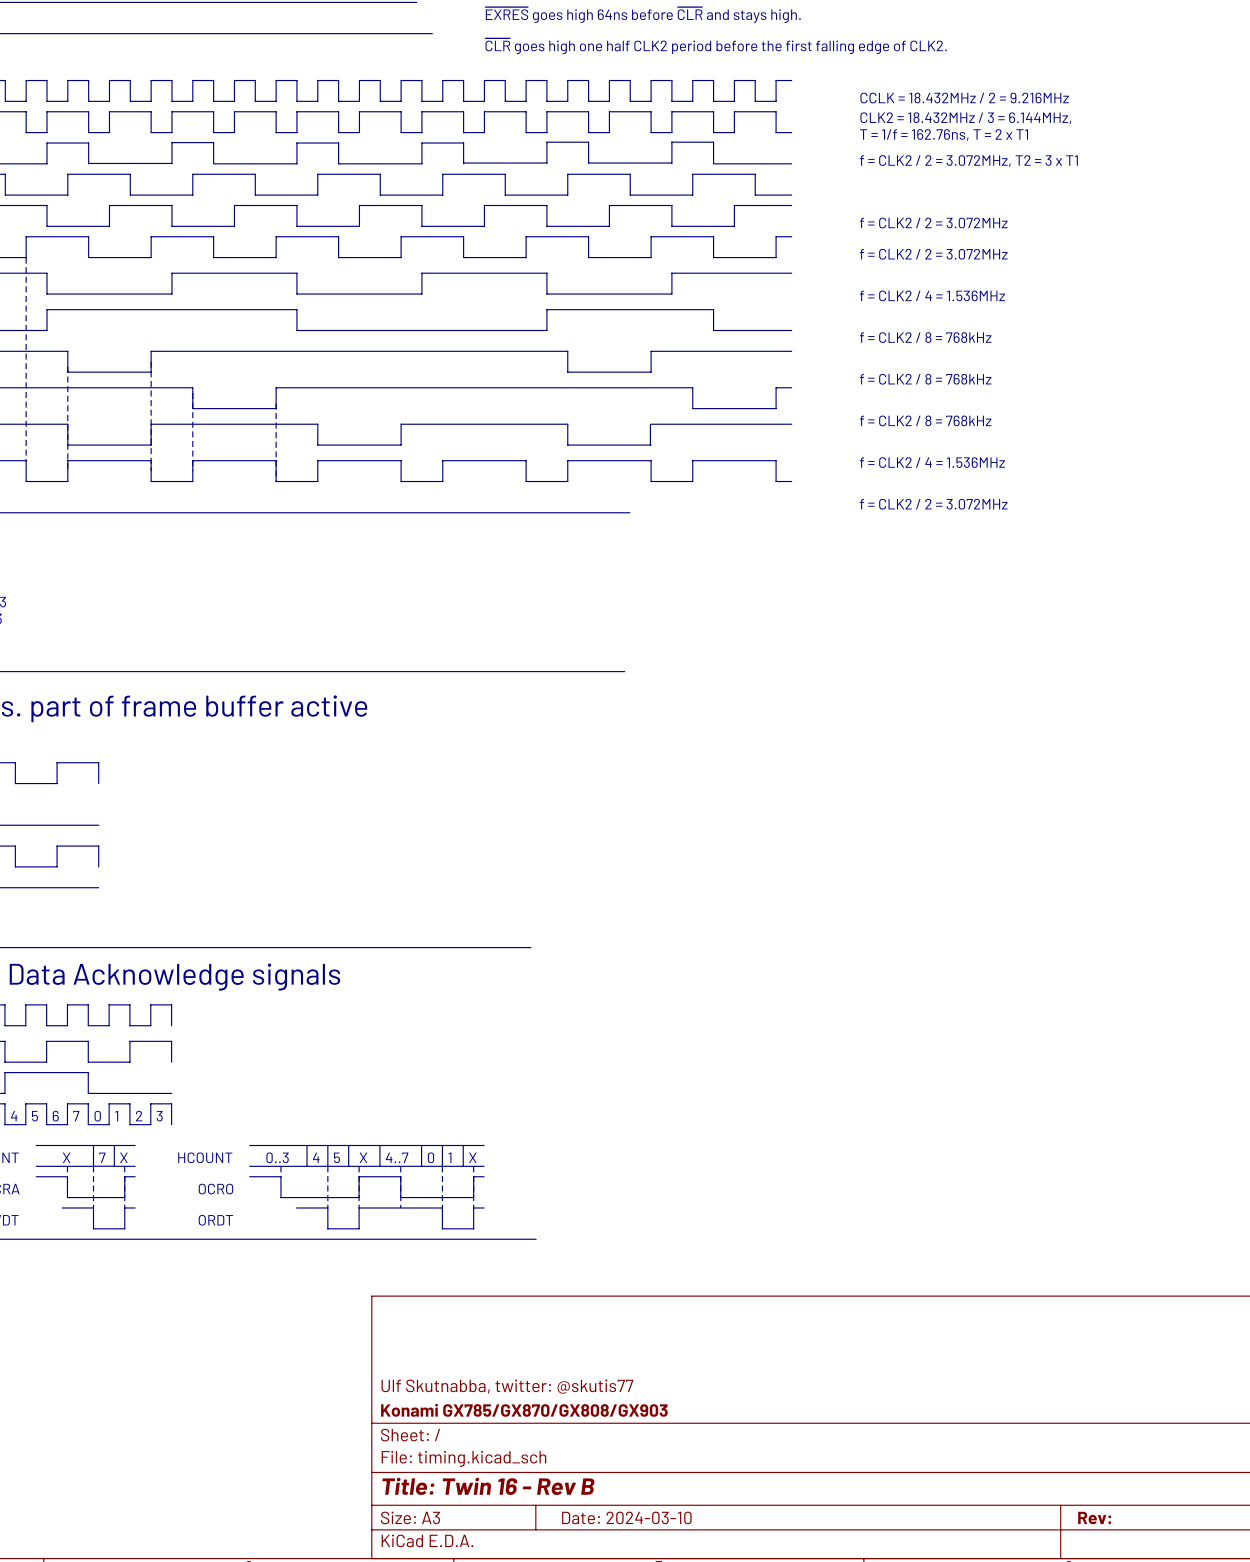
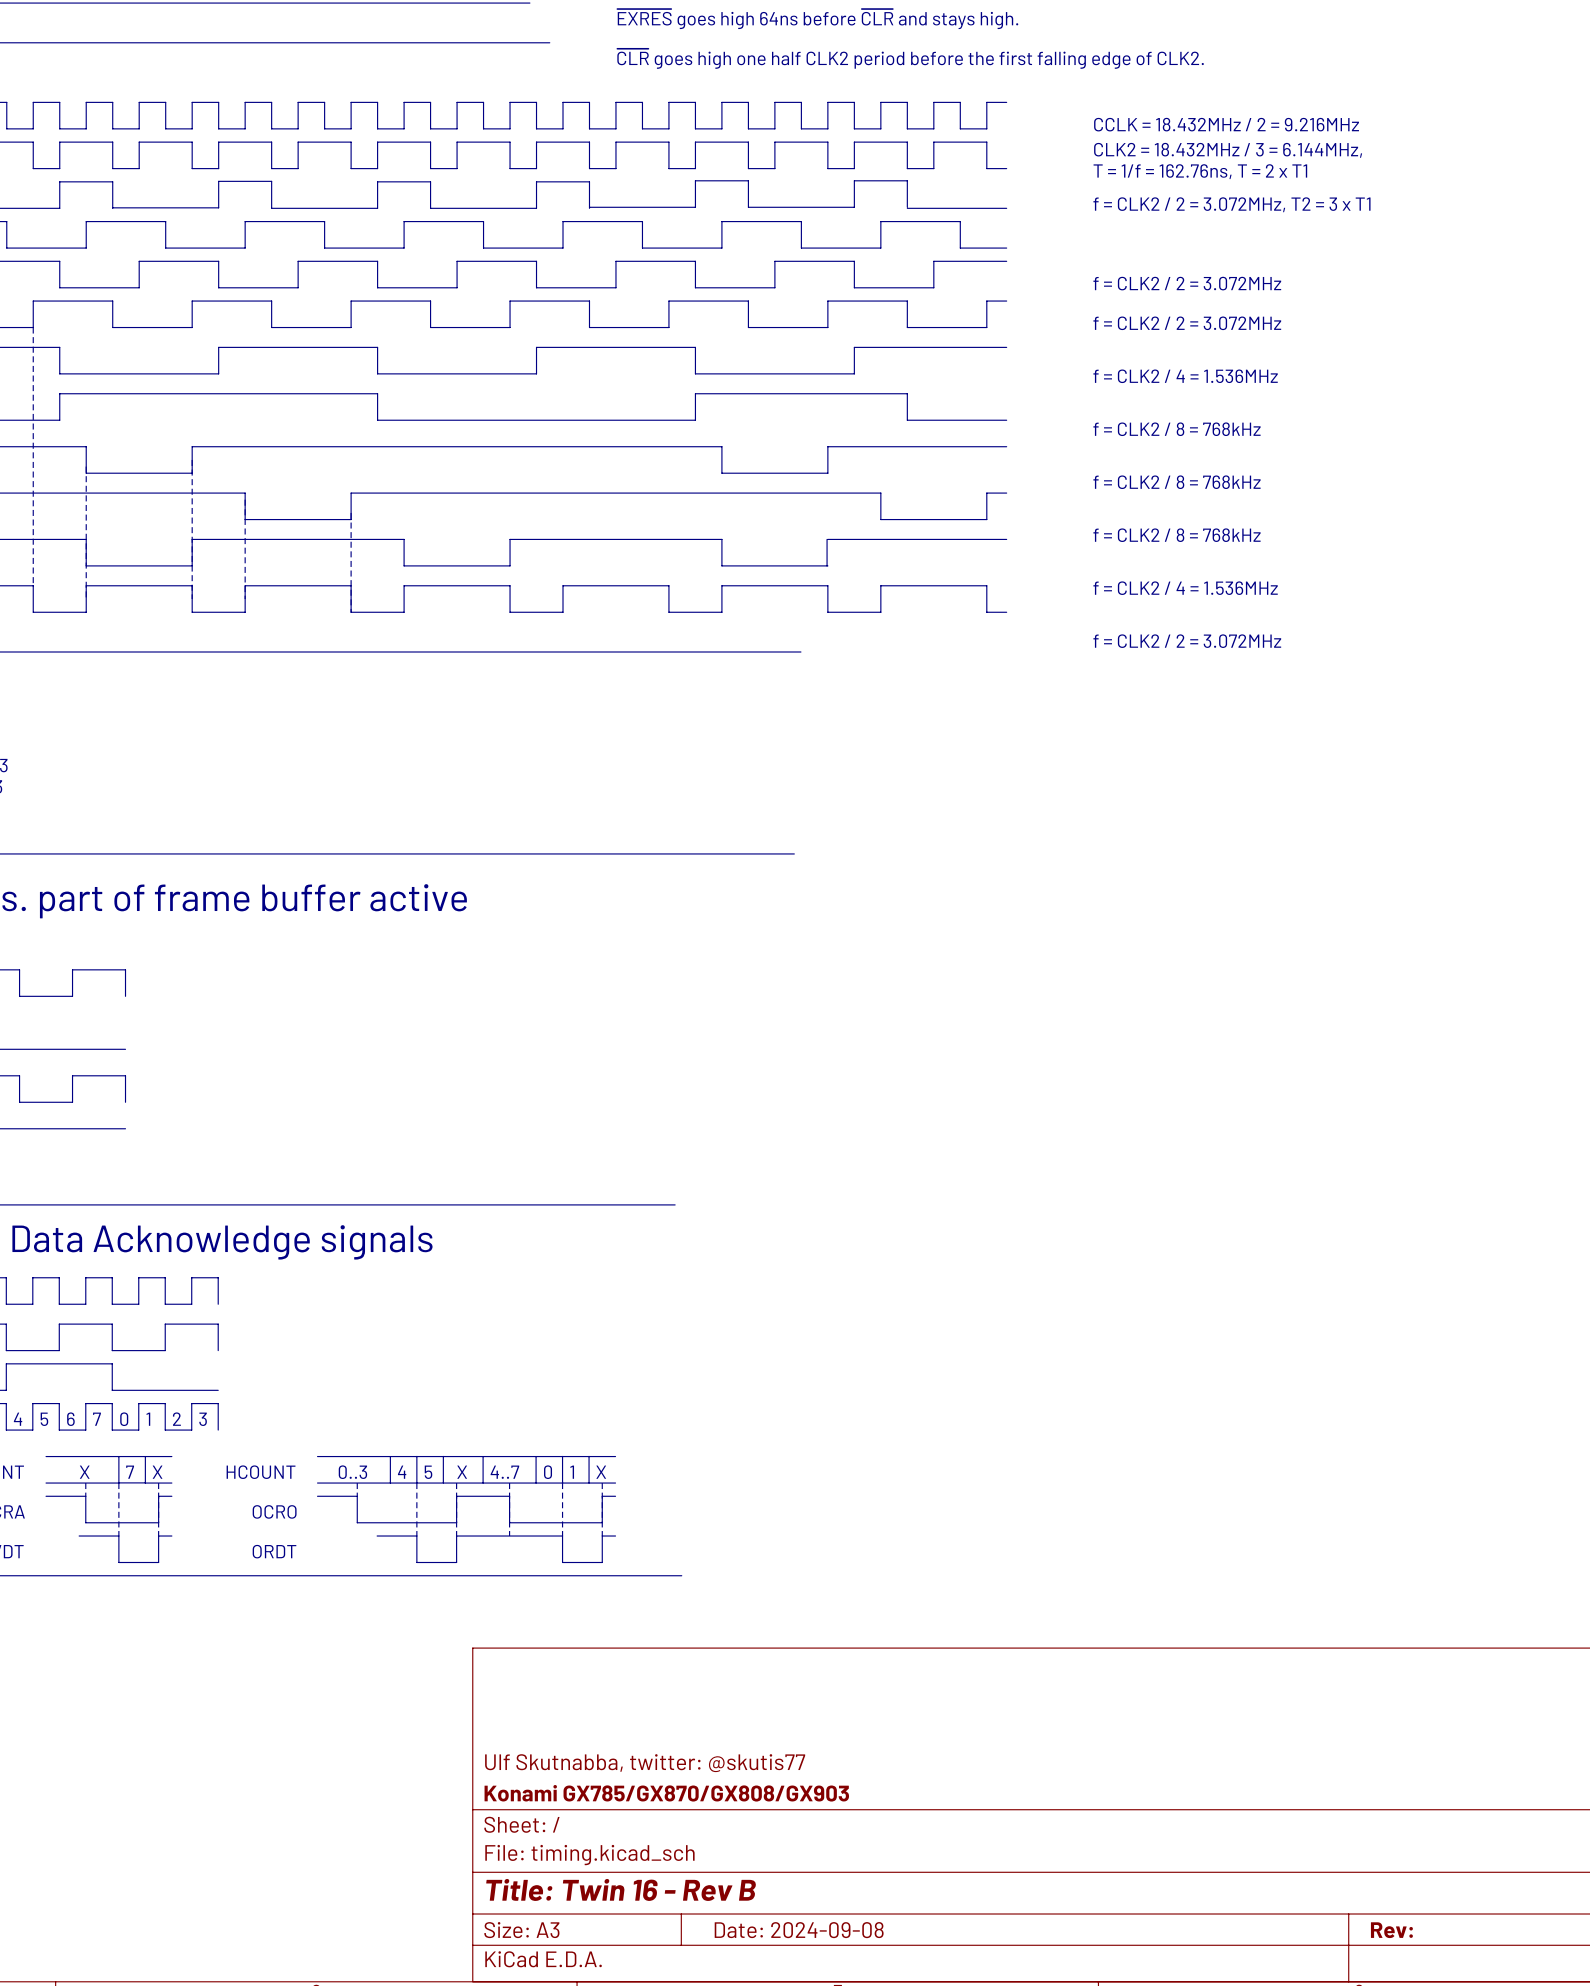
title block: Date: 2024-03-10 (626, 1517) -> Date: 2024-09-08 (799, 1930)

